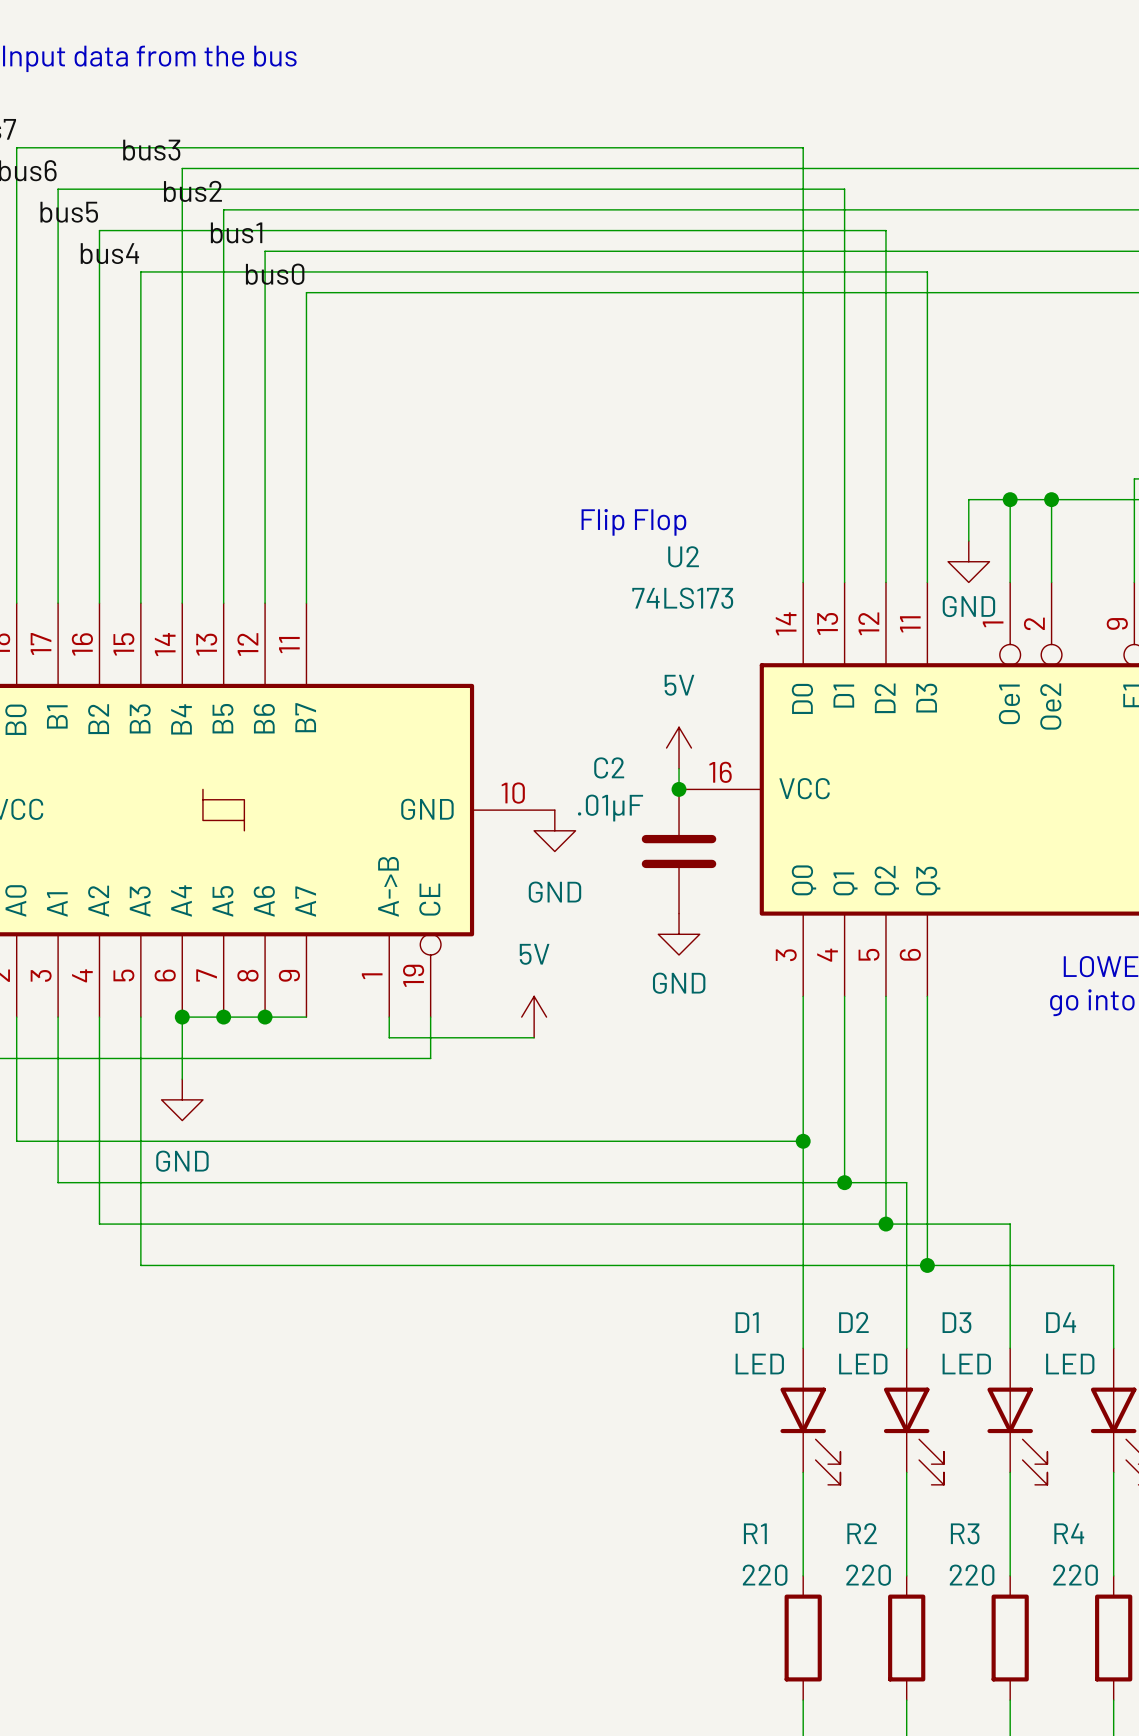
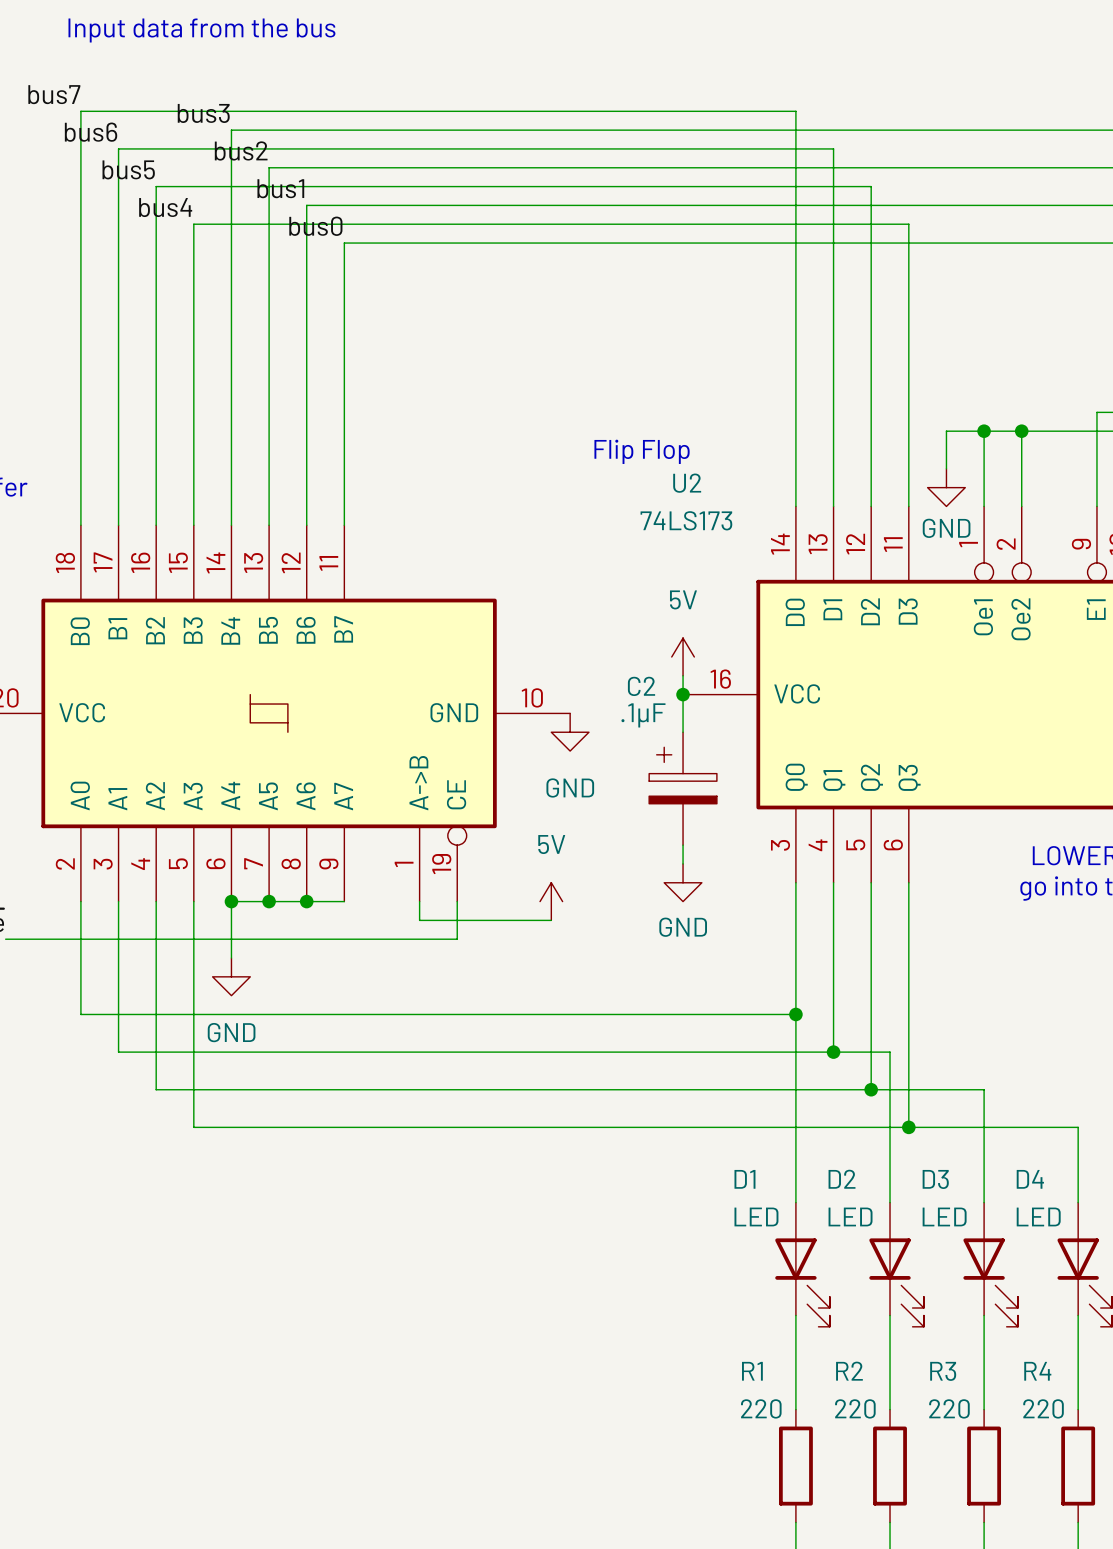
C2 symbol: [641, 789, 717, 914] -> [649, 732, 717, 846]
C2 value: .01µF (610, 808) -> .1µF (643, 715)
power symbol position: GND (679, 934) -> GND (683, 882)
wire: none -> (683, 845) (683, 863)

